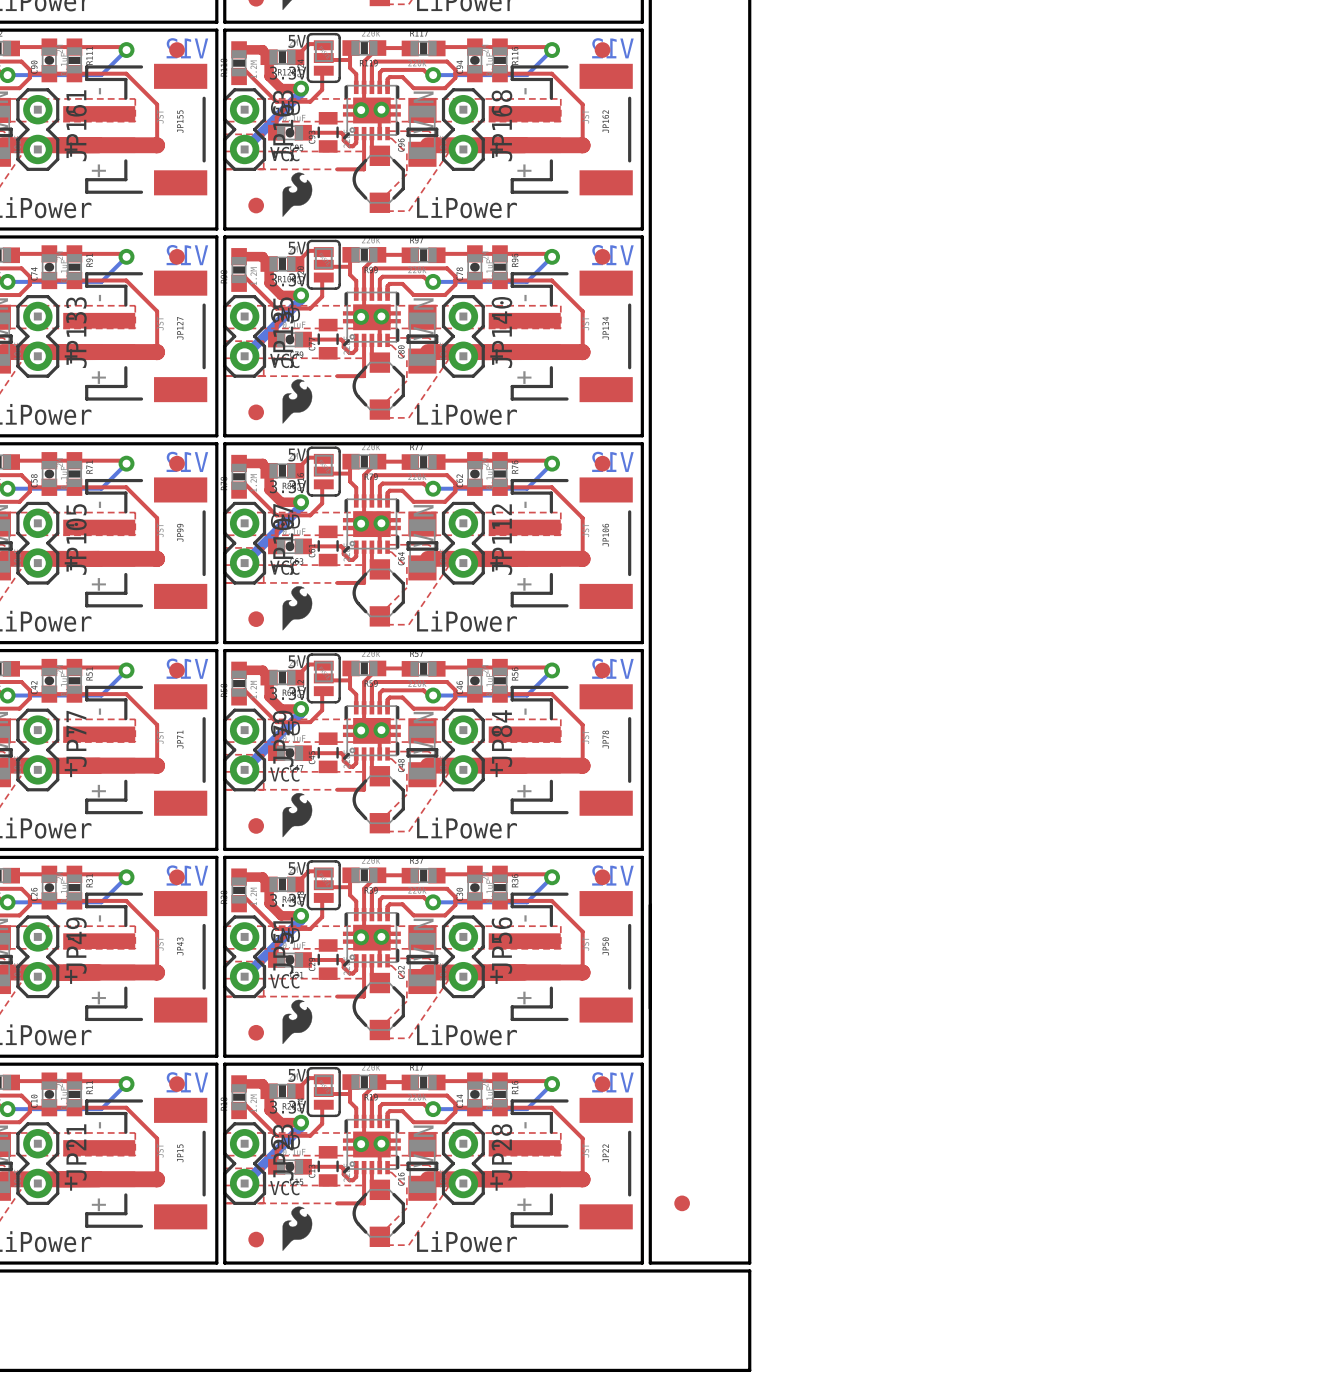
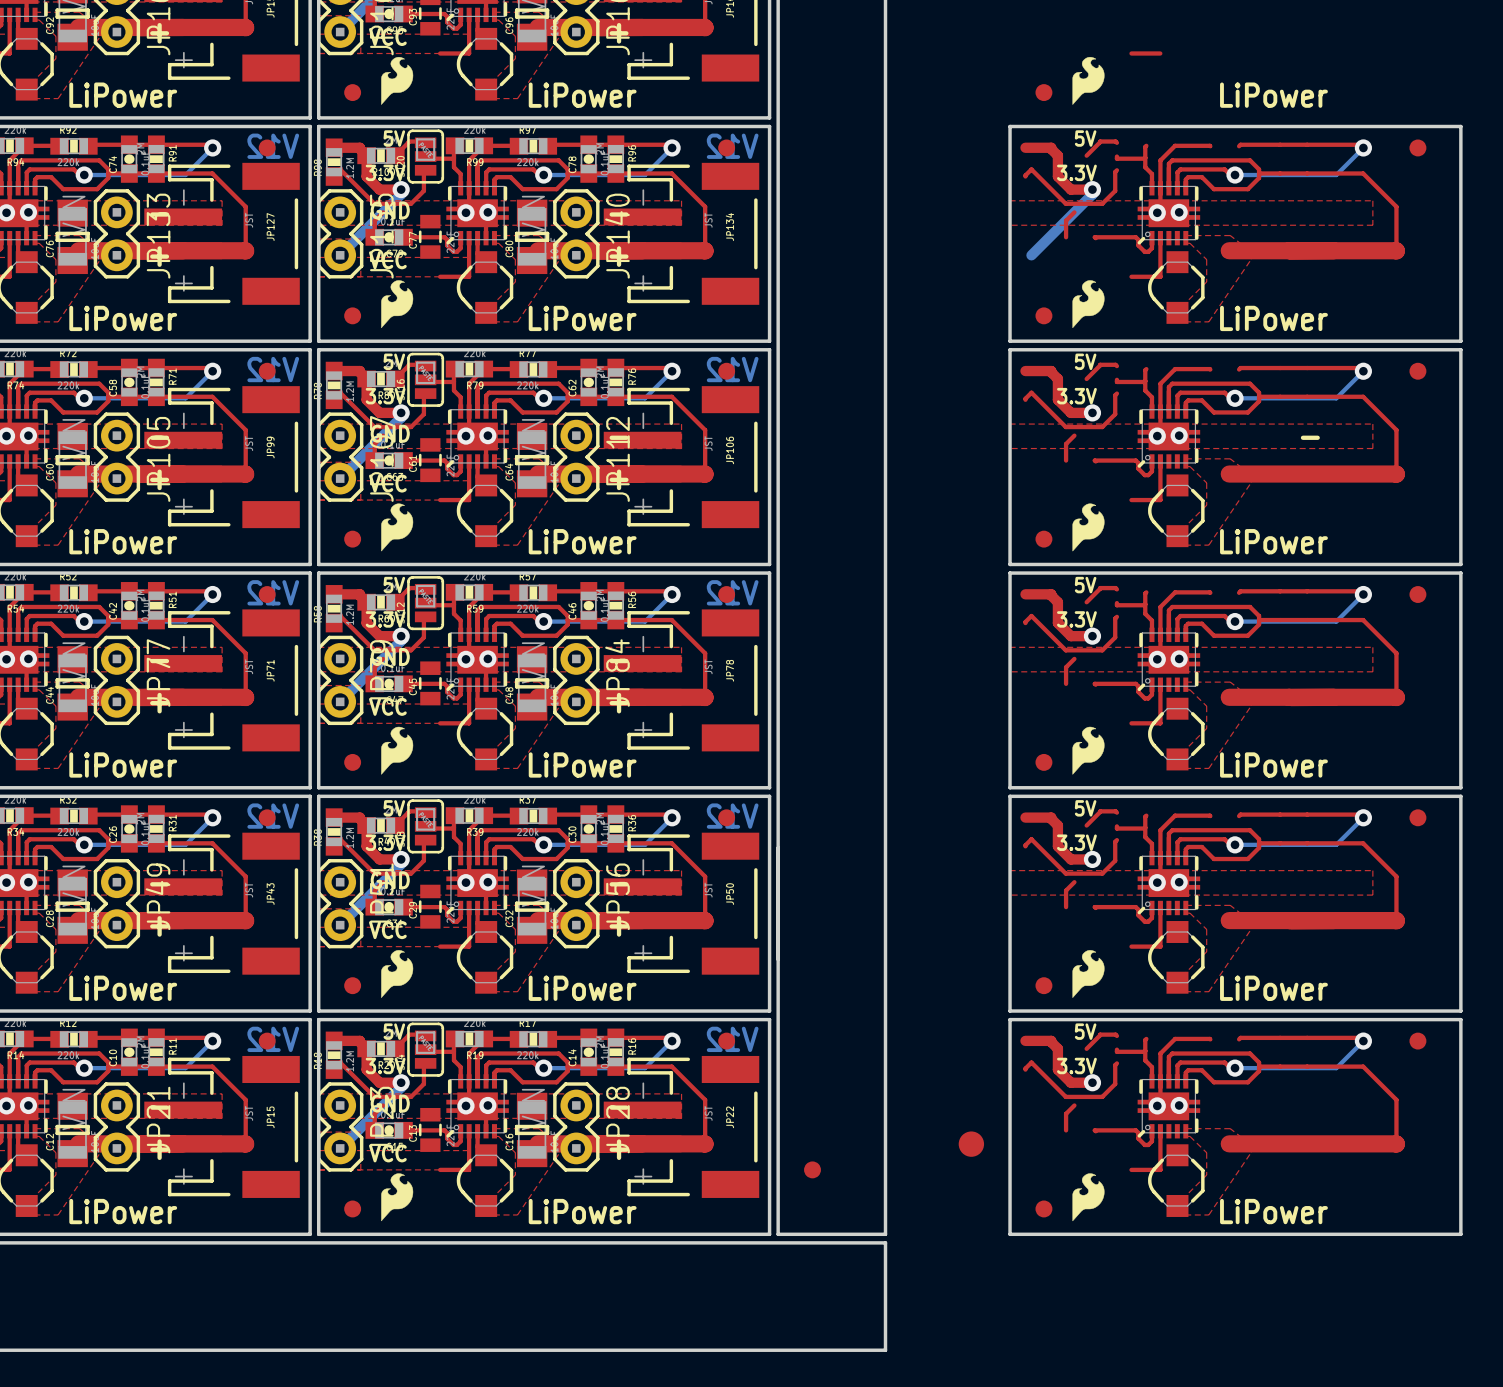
top track: none -> (1131, 53) (1160, 53)
drawing: none -> [1072, 56, 1105, 105]
part: none -> (1043, 92)
text: none -> LiPower (1273, 95)
board edge: none -> (1010, 126) (1010, 341) (1460, 341) (1460, 126) (1010, 126)
text: none -> 5V (1085, 138)
top track: none -> (1116, 142) (1100, 141) (1086, 155)
top track: none -> (1146, 145) (1145, 167) (1151, 174) (1151, 188)
top track: none -> (1210, 146) (1175, 145) (1160, 160) (1160, 204)
top track: none -> (1239, 146) (1360, 144) (1363, 147)
top track: none -> (1025, 147) (1051, 147) (1057, 155) (1057, 176) (1070, 189) (1092, 189)
bottom track: none -> (1363, 147) (1336, 175) (1235, 175)
via: none -> (1363, 147)
part: none -> (1417, 147)
top track: none -> (1116, 156) (1116, 158) (1145, 157)
top track: none -> (1116, 170) (1115, 172) (1115, 190) (1102, 203) (1065, 203) (1031, 169) (1025, 176)
text: none -> 3.3V (1076, 172)
top track: none -> (1259, 173) (1363, 173) (1396, 206) (1396, 251) (1229, 250) (1224, 255)
top track: none -> (1235, 175) (1230, 175) (1224, 169) (1180, 169) (1177, 172) (1177, 188)
via: none -> (1235, 175)
top track: none -> (1168, 188) (1168, 163) (1172, 160) (1250, 160) (1259, 169) (1259, 178) (1247, 189) (1213, 189) (1201, 177) (1188, 177) (1185, 179) (1185, 191)
bottom track: none -> (1092, 189) (1092, 194) (1031, 255)
via: none -> (1092, 189)
top zone outline: none -> (1009, 200) (1372, 200) (1372, 225) (1010, 225) (1009, 200)
top track: none -> (1074, 212) (1066, 220) (1066, 237)
via: none -> (1157, 212)
via: none -> (1179, 212)
part: none -> (1168, 213)
top zone outline: none -> (1185, 234) (1185, 243) (1189, 243) (1206, 259) (1206, 281) (1185, 303) (1185, 321) (1208, 321) (1251, 259) (1251, 244) (1241, 244) (1230, 235) (1185, 234)
top track: none -> (1095, 238) (1135, 237) (1138, 239) (1138, 245) (1144, 251) (1148, 251) (1151, 248) (1151, 238)
top track: none -> (1160, 238) (1160, 276)
top track: none -> (1131, 276) (1160, 276)
drawing: none -> [1072, 280, 1105, 329]
part: none -> (1176, 287)
part: none -> (1043, 315)
text: none -> LiPower (1273, 318)
board edge: none -> (1010, 349) (1010, 564) (1460, 564) (1460, 349) (1010, 349)
text: none -> 5V (1085, 361)
top track: none -> (1116, 366) (1100, 364) (1086, 378)
top track: none -> (1146, 369) (1145, 390) (1151, 397) (1151, 411)
top track: none -> (1210, 369) (1175, 369) (1160, 383) (1160, 427)
top track: none -> (1239, 369) (1360, 368) (1363, 371)
top track: none -> (1025, 371) (1051, 371) (1057, 378) (1057, 399) (1070, 412) (1092, 412)
bottom track: none -> (1363, 371) (1336, 398) (1235, 398)
via: none -> (1363, 371)
part: none -> (1417, 371)
top track: none -> (1116, 379) (1116, 381) (1145, 381)
top track: none -> (1116, 393) (1115, 395) (1115, 414) (1102, 427) (1065, 427) (1031, 392) (1025, 399)
text: none -> 3.3V (1076, 396)
top track: none -> (1259, 396) (1363, 396) (1396, 430) (1396, 474) (1229, 474) (1224, 478)
top track: none -> (1235, 398) (1230, 398) (1224, 392) (1180, 392) (1177, 395) (1177, 411)
via: none -> (1235, 398)
top track: none -> (1168, 411) (1168, 387) (1172, 383) (1250, 383) (1259, 392) (1259, 401) (1247, 412) (1213, 412) (1201, 400) (1188, 400) (1185, 402) (1185, 414)
via: none -> (1092, 412)
top zone outline: none -> (1009, 424) (1372, 424) (1372, 448) (1010, 448) (1009, 424)
top track: none -> (1074, 435) (1066, 444) (1066, 460)
via: none -> (1157, 436)
via: none -> (1179, 435)
part: none -> (1168, 436)
text: none -> - (1310, 437)
top zone outline: none -> (1185, 457) (1185, 466) (1189, 466) (1206, 482) (1206, 505) (1185, 526) (1185, 545) (1208, 545) (1251, 482) (1251, 467) (1241, 467) (1230, 458) (1185, 457)
top track: none -> (1095, 461) (1135, 460) (1138, 463) (1138, 468) (1144, 475) (1148, 475) (1151, 471) (1151, 461)
top track: none -> (1160, 461) (1160, 499)
top track: none -> (1131, 500) (1160, 500)
drawing: none -> [1072, 503, 1105, 552]
part: none -> (1176, 510)
part: none -> (1043, 539)
text: none -> LiPower (1273, 541)
board edge: none -> (1010, 573) (1010, 787) (1460, 787) (1460, 573) (1010, 573)
text: none -> 5V (1085, 585)
top track: none -> (1116, 589) (1100, 588) (1086, 602)
top track: none -> (1146, 592) (1145, 613) (1151, 620) (1151, 634)
top track: none -> (1210, 592) (1175, 592) (1160, 607) (1160, 651)
top track: none -> (1239, 592) (1360, 591) (1363, 594)
top track: none -> (1025, 594) (1051, 594) (1057, 602) (1057, 623) (1070, 636) (1092, 636)
bottom track: none -> (1363, 594) (1336, 621) (1235, 621)
via: none -> (1363, 594)
part: none -> (1417, 594)
top track: none -> (1116, 603) (1116, 605) (1145, 604)
top track: none -> (1116, 616) (1115, 618) (1115, 637) (1102, 650) (1065, 650) (1031, 615) (1025, 623)
text: none -> 3.3V (1076, 619)
top track: none -> (1259, 620) (1363, 620) (1396, 653) (1396, 697) (1229, 697) (1224, 701)
top track: none -> (1235, 621) (1230, 621) (1224, 615) (1180, 615) (1177, 619) (1177, 634)
via: none -> (1235, 621)
top track: none -> (1168, 634) (1168, 610) (1172, 606) (1250, 606) (1259, 615) (1259, 624) (1247, 635) (1213, 635) (1201, 623) (1188, 623) (1185, 626) (1185, 637)
via: none -> (1092, 636)
top zone outline: none -> (1009, 647) (1372, 647) (1372, 671) (1010, 671) (1009, 647)
top track: none -> (1074, 658) (1066, 667) (1066, 683)
via: none -> (1157, 659)
part: none -> (1168, 659)
via: none -> (1179, 658)
top zone outline: none -> (1185, 681) (1185, 689) (1189, 689) (1206, 706) (1206, 728) (1185, 749) (1185, 768) (1208, 768) (1251, 705) (1251, 691) (1241, 691) (1230, 682) (1185, 681)
top track: none -> (1095, 684) (1135, 683) (1138, 686) (1138, 691) (1144, 698) (1148, 698) (1151, 694) (1151, 684)
top track: none -> (1160, 684) (1160, 723)
top track: none -> (1131, 723) (1160, 723)
drawing: none -> [1072, 726, 1105, 775]
part: none -> (1176, 734)
part: none -> (1043, 762)
text: none -> LiPower (1273, 764)
board edge: none -> (1010, 796) (1010, 1011) (1460, 1011) (1460, 796) (1010, 796)
text: none -> 5V (1085, 808)
top track: none -> (1116, 812) (1100, 811) (1086, 825)
top track: none -> (1146, 815) (1145, 837) (1151, 843) (1151, 858)
top track: none -> (1210, 816) (1175, 815) (1160, 830) (1160, 874)
top track: none -> (1239, 816) (1360, 814) (1363, 817)
top track: none -> (1025, 817) (1051, 817) (1057, 825) (1057, 846) (1070, 859) (1092, 859)
bottom track: none -> (1363, 817) (1336, 844) (1235, 844)
via: none -> (1363, 817)
part: none -> (1417, 817)
top track: none -> (1116, 826) (1116, 828) (1145, 827)
top track: none -> (1116, 840) (1115, 841) (1115, 860) (1102, 873) (1065, 873) (1031, 839) (1025, 846)
text: none -> 3.3V (1076, 842)
top track: none -> (1259, 843) (1363, 843) (1396, 876) (1396, 920) (1229, 920) (1224, 925)
top track: none -> (1235, 844) (1230, 844) (1224, 839) (1180, 839) (1177, 842) (1177, 858)
via: none -> (1235, 844)
top track: none -> (1168, 858) (1168, 833) (1172, 830) (1250, 830) (1259, 839) (1259, 847) (1247, 859) (1213, 859) (1201, 847) (1188, 847) (1185, 849) (1185, 861)
via: none -> (1092, 859)
top zone outline: none -> (1009, 870) (1372, 870) (1372, 895) (1010, 895) (1009, 870)
top track: none -> (1074, 882) (1066, 890) (1066, 907)
via: none -> (1179, 882)
via: none -> (1157, 882)
part: none -> (1168, 883)
top zone outline: none -> (1185, 904) (1185, 913) (1189, 913) (1206, 929) (1206, 951) (1185, 973) (1185, 991) (1208, 991) (1251, 929) (1251, 914) (1241, 914) (1230, 905) (1185, 904)
top track: none -> (1095, 908) (1135, 907) (1138, 909) (1138, 915) (1144, 921) (1148, 921) (1151, 918) (1151, 908)
top track: none -> (1160, 908) (1160, 946)
top track: none -> (1131, 946) (1160, 946)
drawing: none -> [1072, 950, 1105, 998]
part: none -> (1176, 957)
part: none -> (1043, 985)
text: none -> LiPower (1273, 988)
board edge: none -> (1010, 1019) (1460, 1019) (1460, 1234) (1010, 1234) (1010, 1019)
text: none -> 5V (1085, 1031)
top track: none -> (1116, 1035) (1100, 1034) (1086, 1048)
top track: none -> (1146, 1038) (1145, 1060) (1151, 1067) (1151, 1081)
top track: none -> (1210, 1039) (1175, 1038) (1160, 1053) (1160, 1097)
top track: none -> (1239, 1039) (1360, 1037) (1363, 1041)
top track: none -> (1025, 1040) (1051, 1040) (1057, 1048) (1057, 1069) (1070, 1082) (1092, 1082)
bottom track: none -> (1363, 1041) (1336, 1068) (1235, 1068)
via: none -> (1363, 1041)
part: none -> (1417, 1041)
top track: none -> (1116, 1049) (1116, 1051) (1145, 1050)
top track: none -> (1116, 1063) (1115, 1065) (1115, 1084) (1102, 1096) (1065, 1096) (1031, 1062) (1025, 1069)
text: none -> 3.3V (1076, 1065)
top track: none -> (1259, 1066) (1363, 1066) (1396, 1099) (1396, 1144) (1229, 1143) (1224, 1148)
top track: none -> (1235, 1068) (1230, 1068) (1224, 1062) (1180, 1062) (1177, 1065) (1177, 1081)
via: none -> (1235, 1068)
top track: none -> (1168, 1081) (1168, 1056) (1172, 1053) (1250, 1053) (1259, 1062) (1259, 1071) (1247, 1082) (1213, 1082) (1201, 1070) (1188, 1070) (1185, 1072) (1185, 1084)
via: none -> (1092, 1082)
top track: none -> (1074, 1105) (1066, 1113) (1066, 1130)
via: none -> (1179, 1105)
via: none -> (1157, 1105)
part: none -> (1168, 1106)
top zone outline: none -> (1185, 1127) (1230, 1128) (1241, 1137) (1251, 1137) (1251, 1152) (1208, 1214) (1185, 1214) (1185, 1196) (1206, 1175) (1206, 1152) (1189, 1136) (1185, 1136) (1185, 1127)
top track: none -> (1095, 1131) (1135, 1130) (1138, 1132) (1138, 1138) (1144, 1144) (1148, 1144) (1151, 1141) (1151, 1131)
top track: none -> (1160, 1131) (1160, 1169)
part: none -> (971, 1144)
top track: none -> (1131, 1169) (1160, 1169)
drawing: none -> [1072, 1173, 1105, 1222]
part: none -> (1176, 1180)
part: none -> (1043, 1208)
text: none -> LiPower (1273, 1211)

